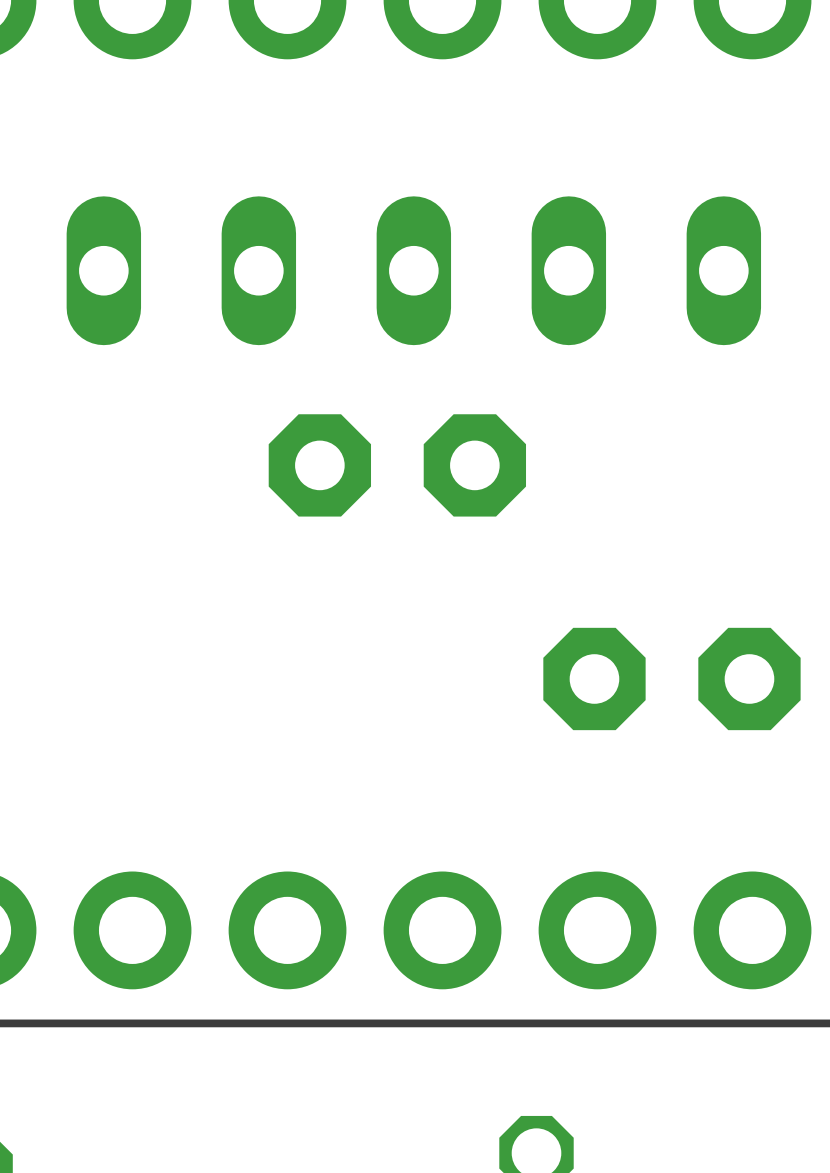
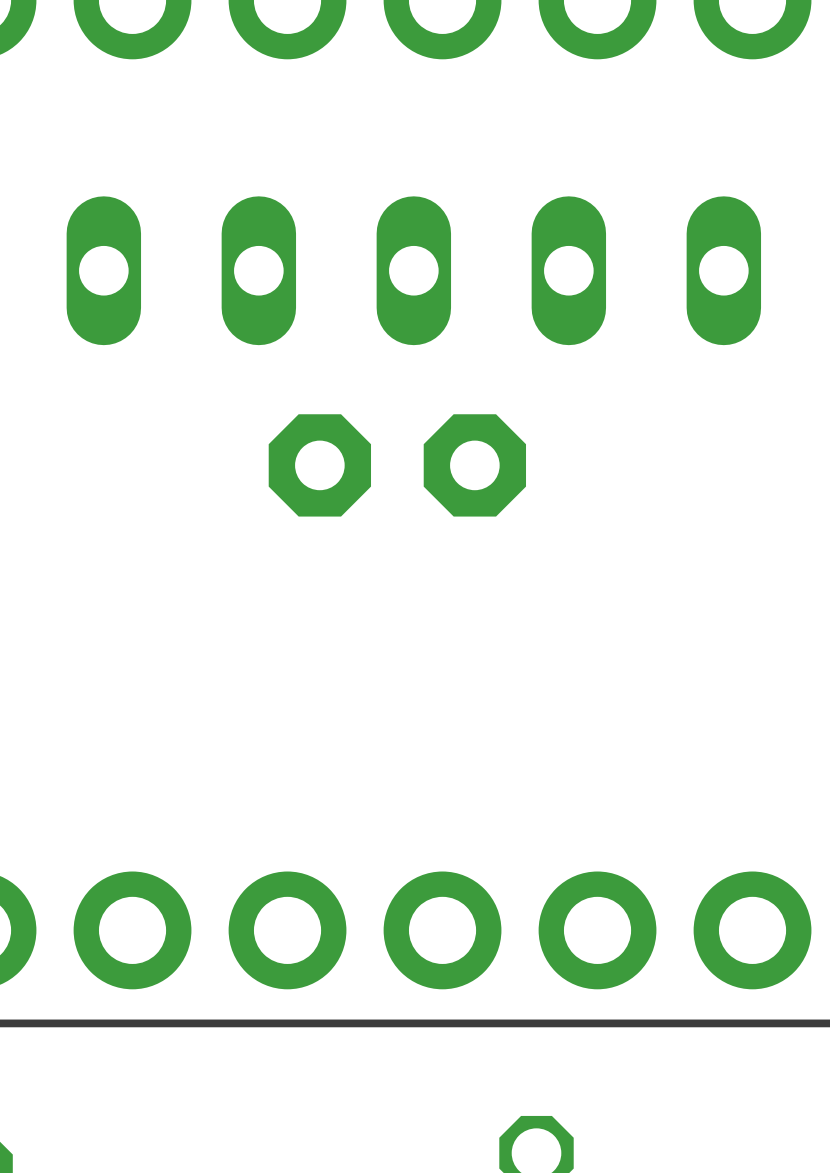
part: (671, 678) -> none

